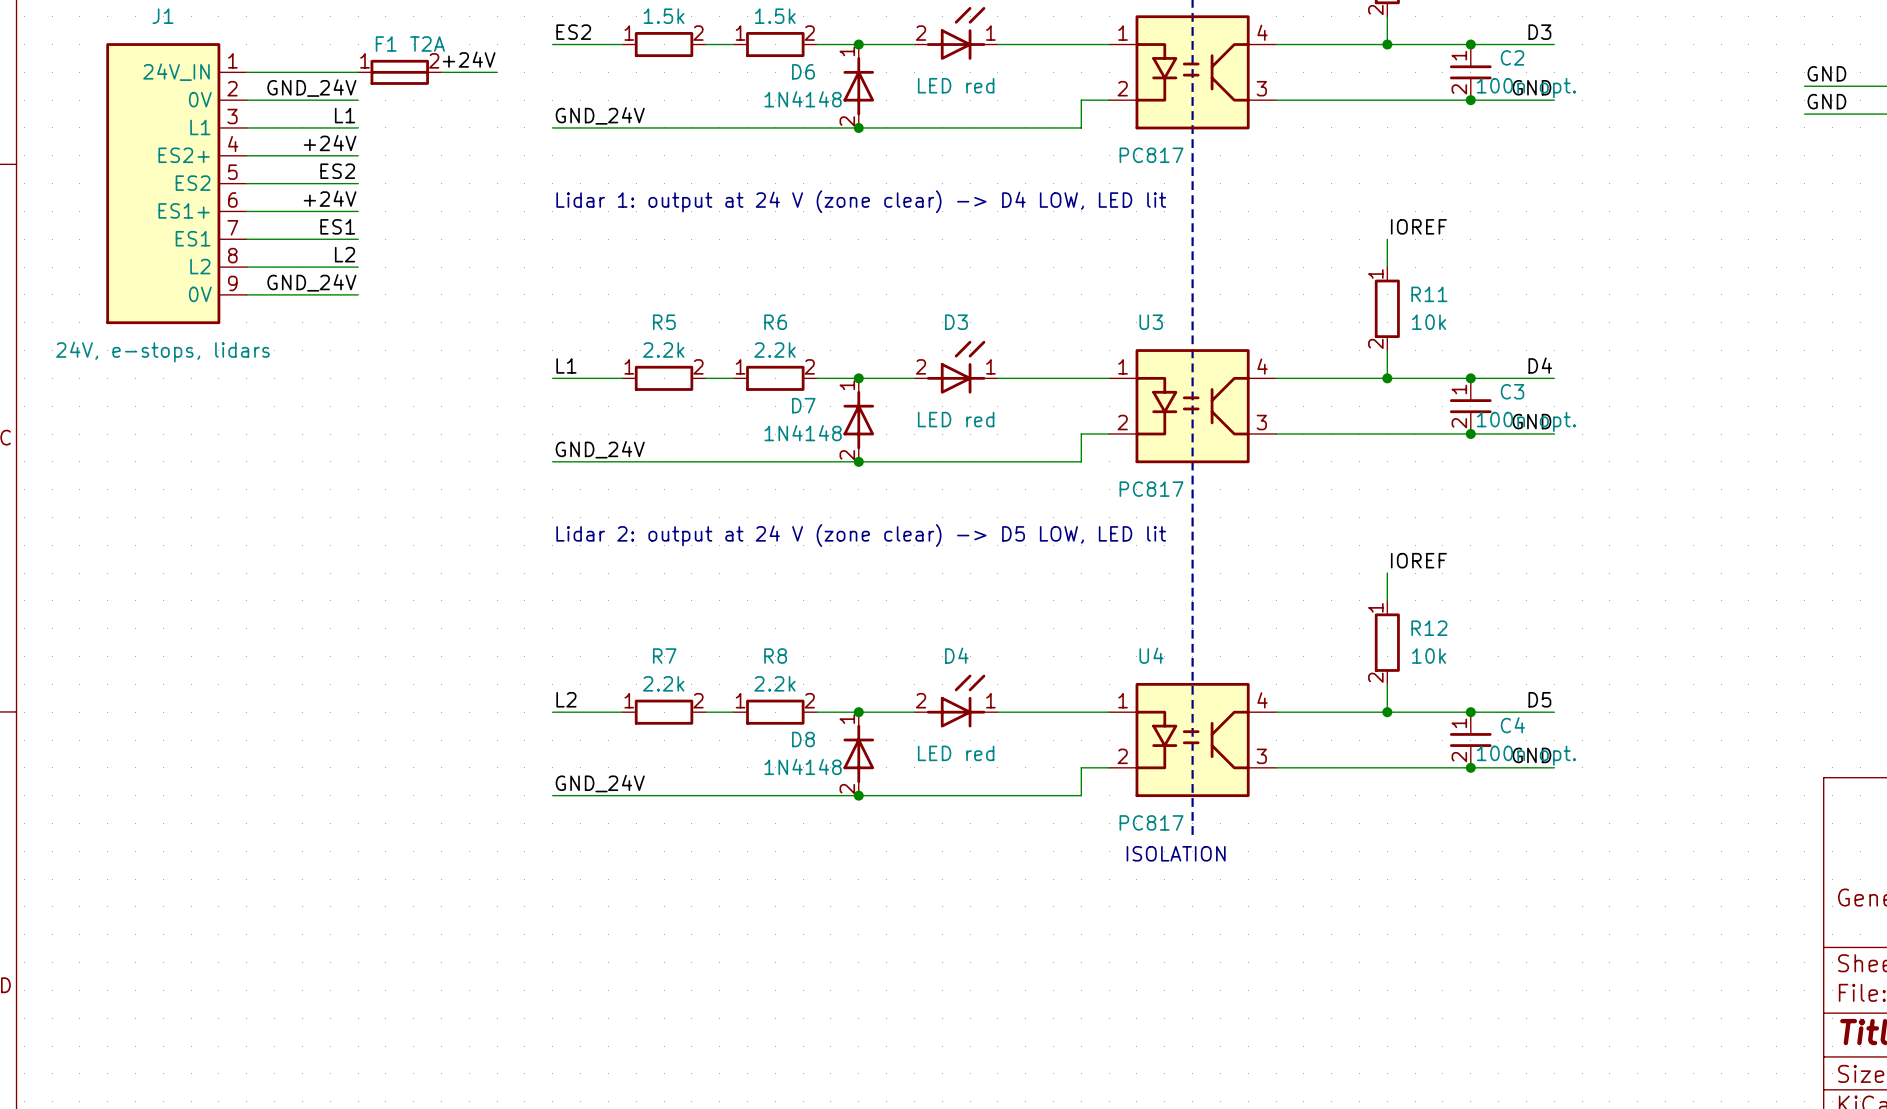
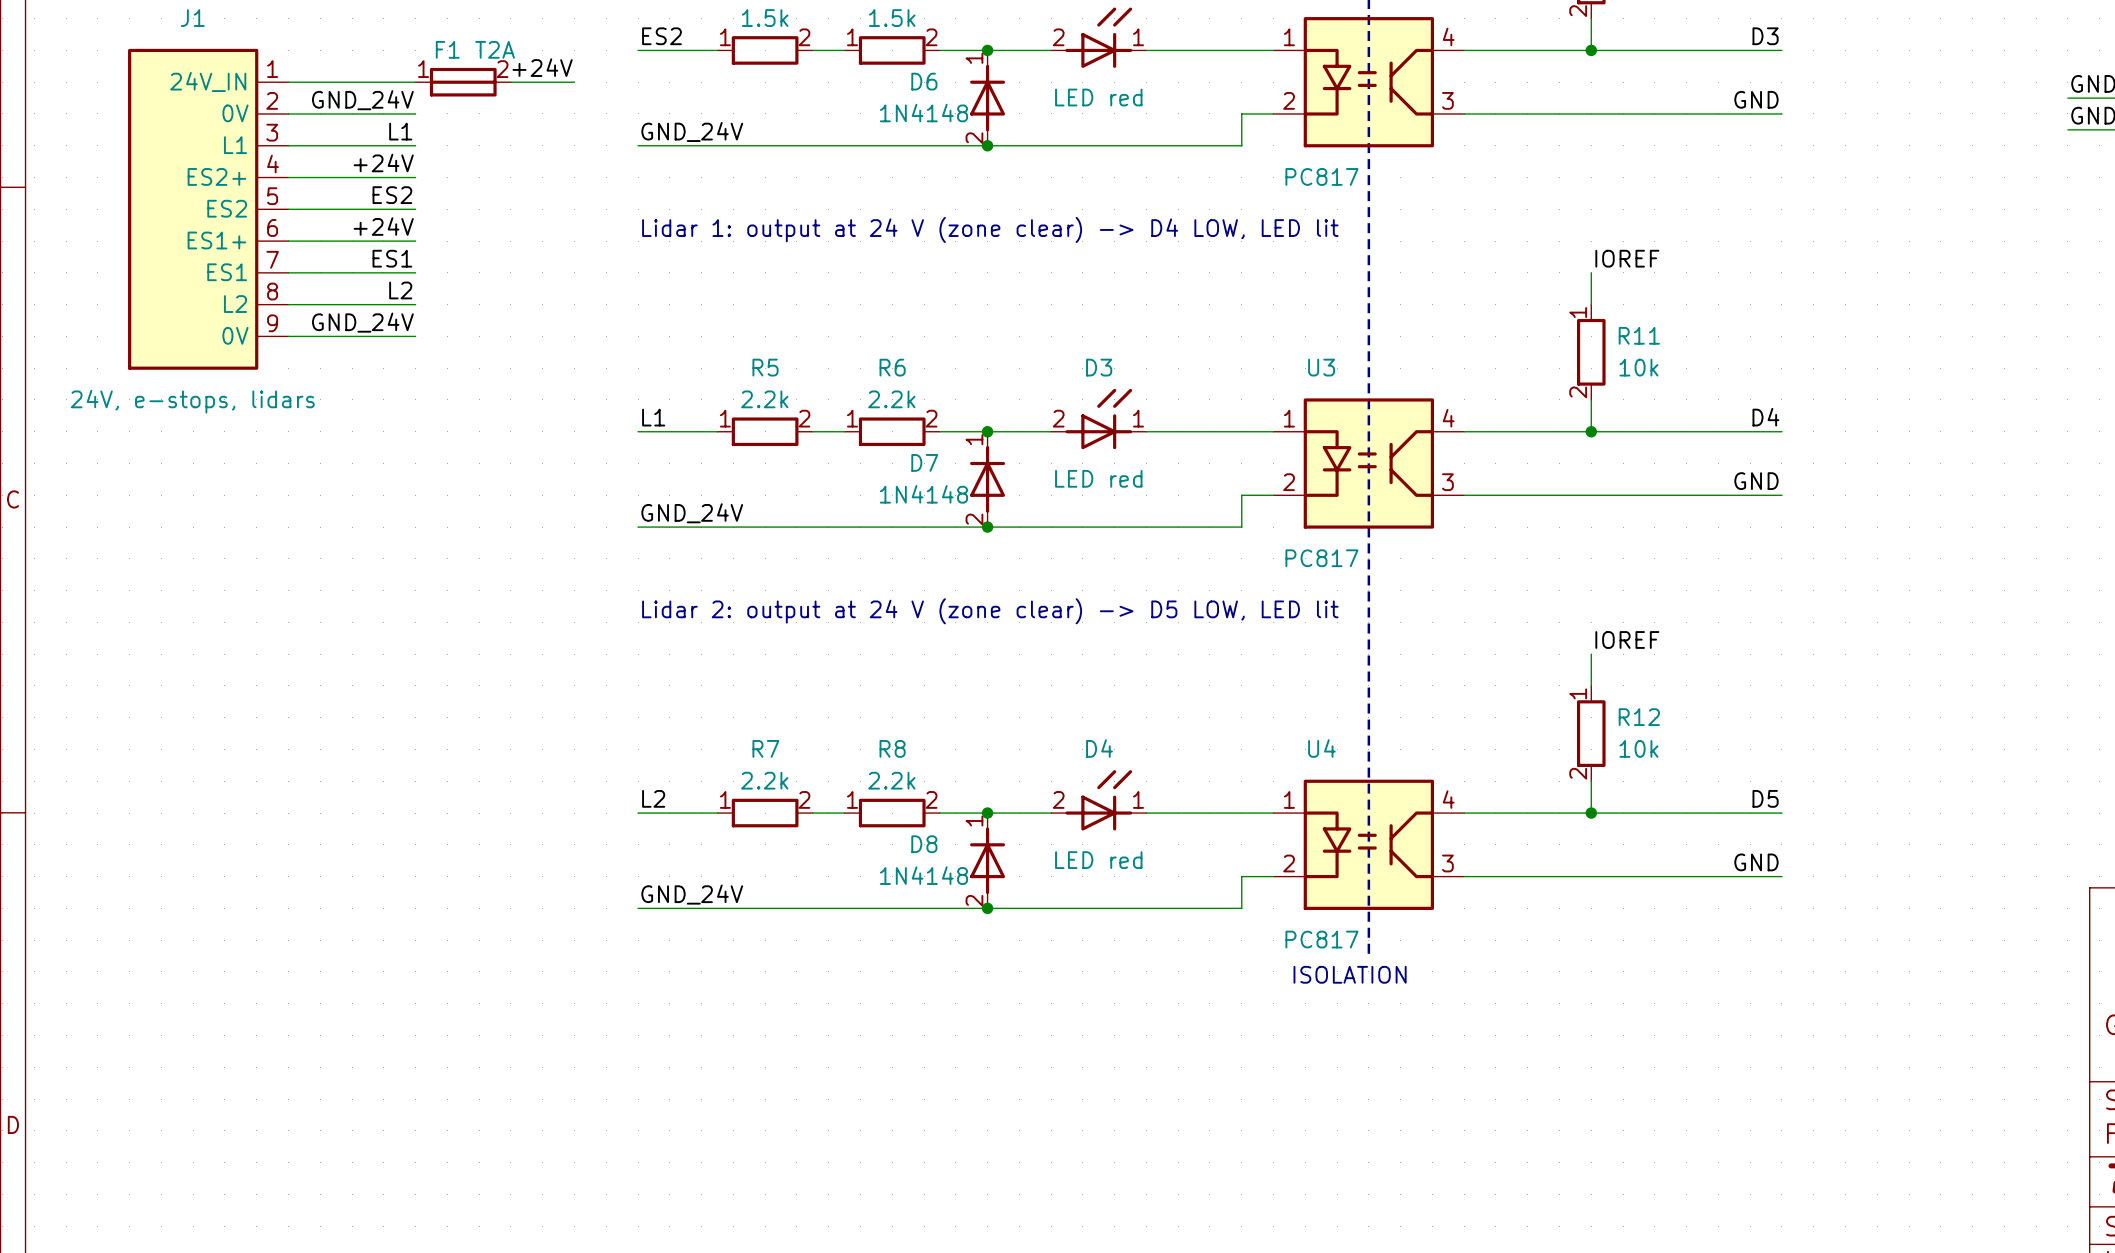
junction: (1470, 44) -> none
C2: 100n opt. (1470, 72) -> none
junction: (1470, 100) -> none
junction: (1470, 378) -> none
C3: 100n opt. (1470, 406) -> none
junction: (1470, 434) -> none
junction: (1470, 712) -> none
C4: 100n opt. (1470, 740) -> none
junction: (1470, 767) -> none

